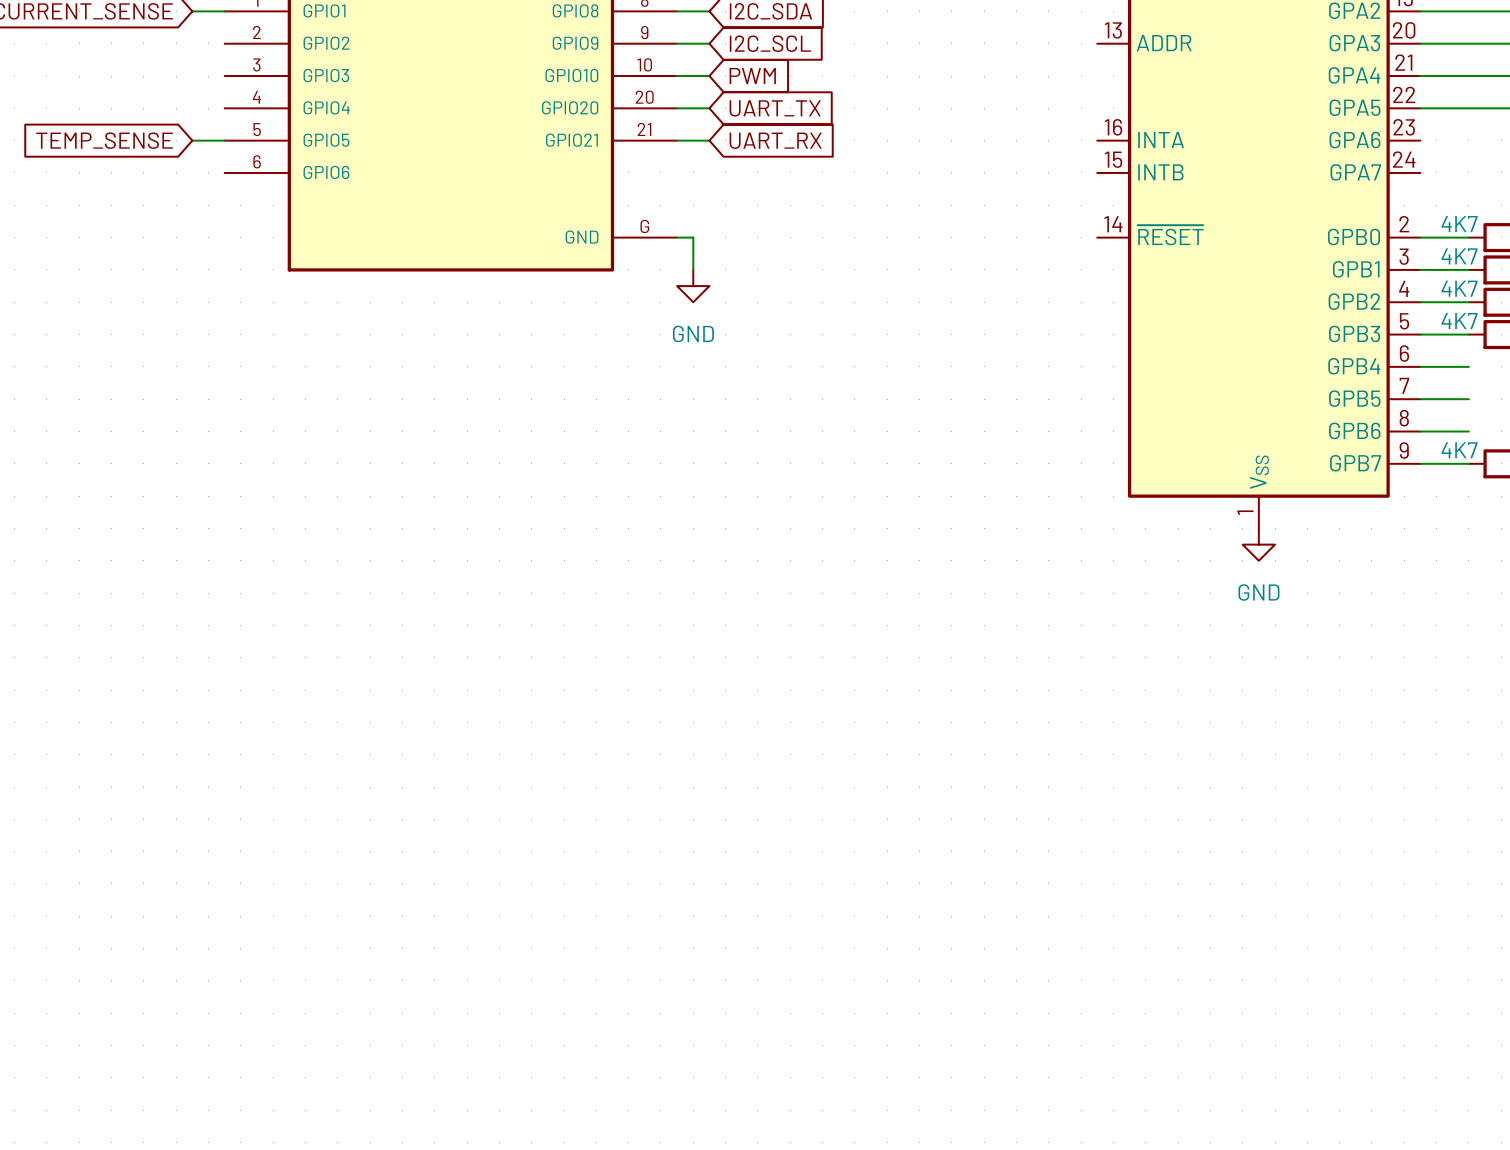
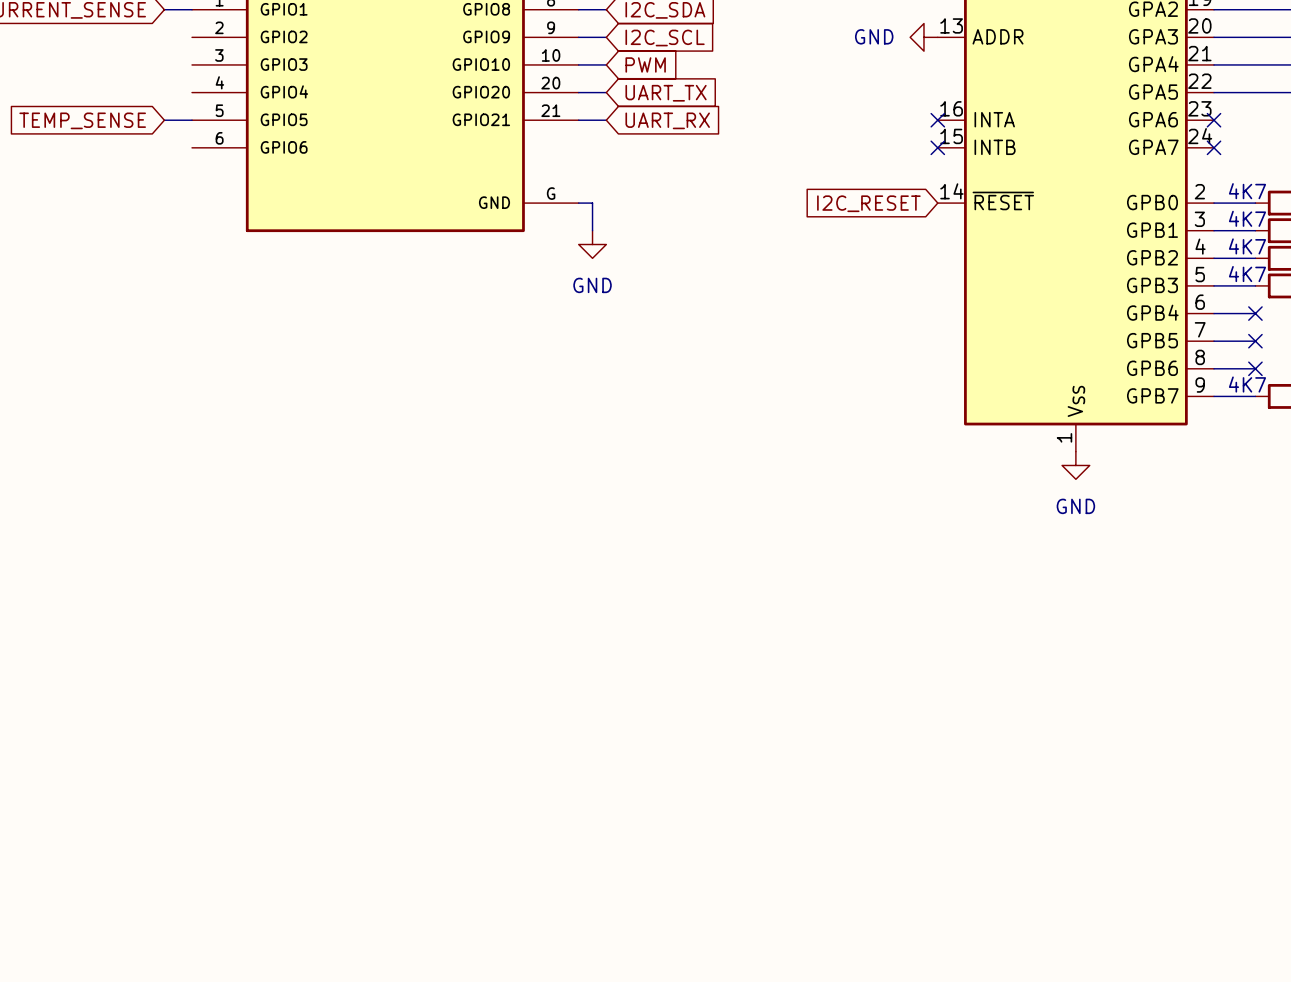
power symbol: none -> GND (923, 37)
no-connect mark: none -> (937, 120)
no-connect mark: none -> (1214, 120)
no-connect mark: none -> (937, 147)
no-connect mark: none -> (1214, 147)
global label: none -> I2C_RESET (868, 203)
no-connect mark: none -> (1255, 313)
no-connect mark: none -> (1255, 341)
no-connect mark: none -> (1255, 368)

